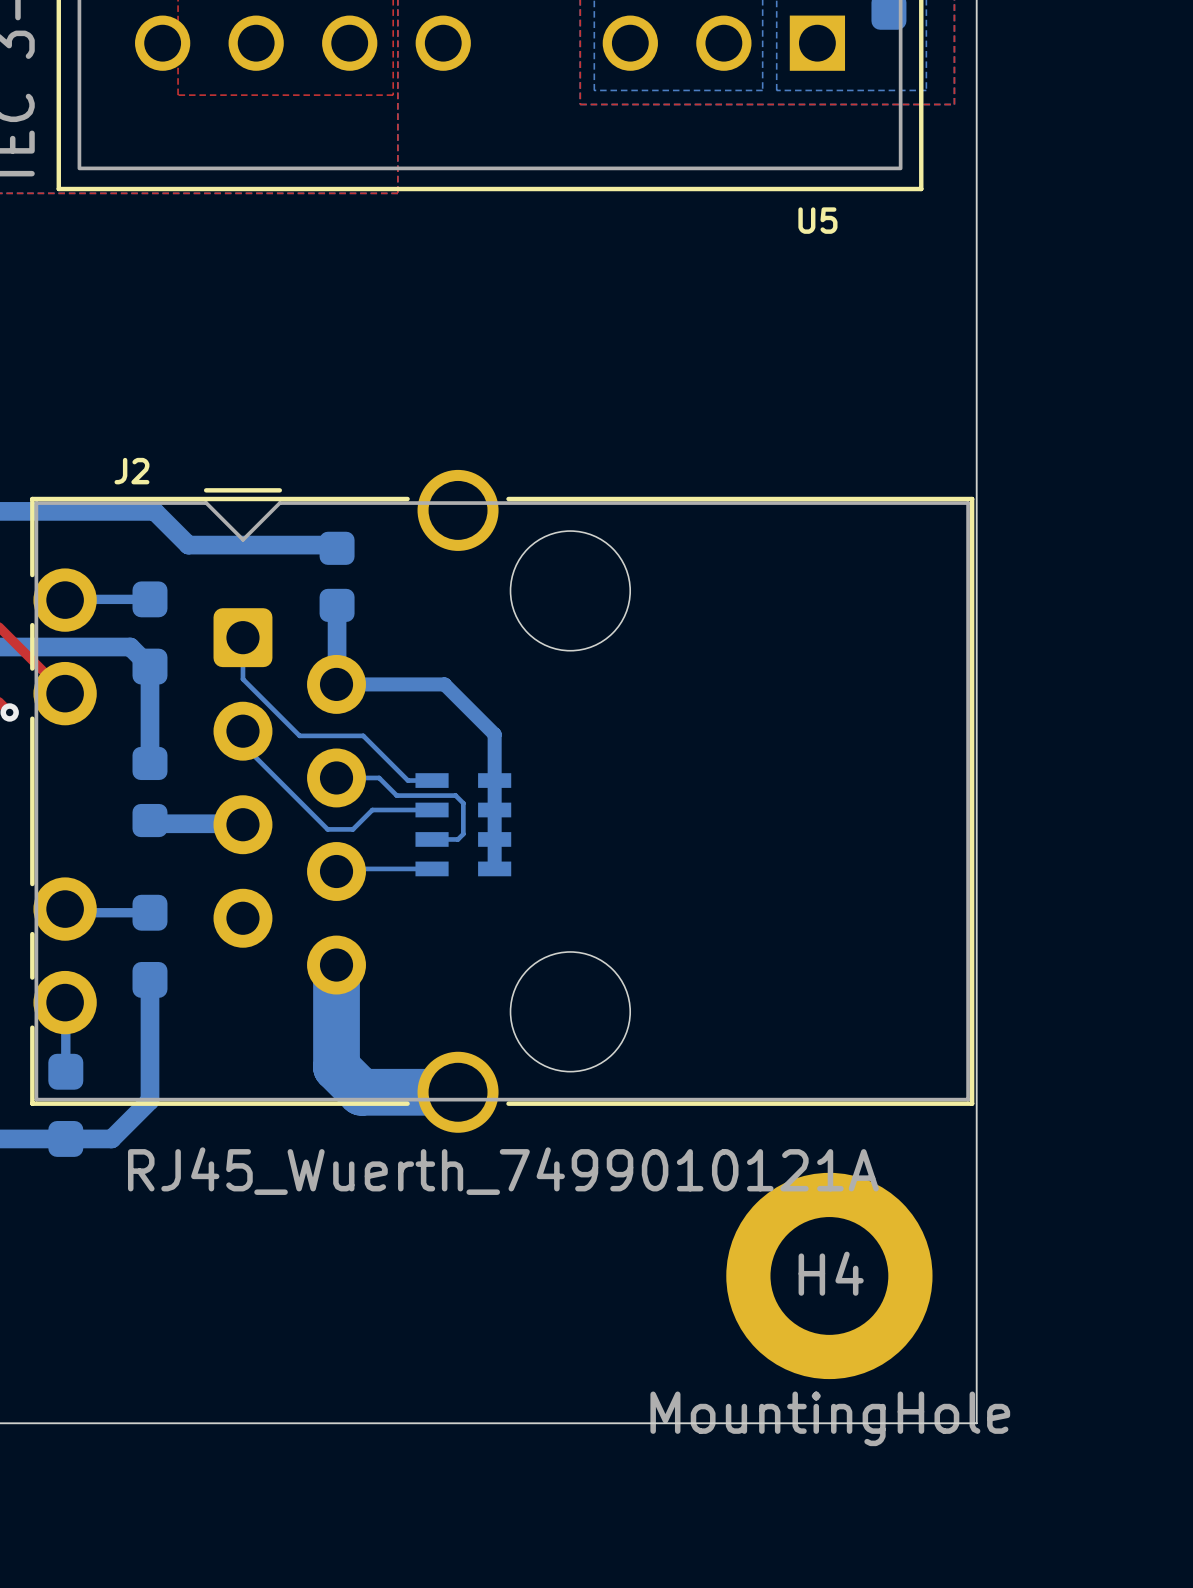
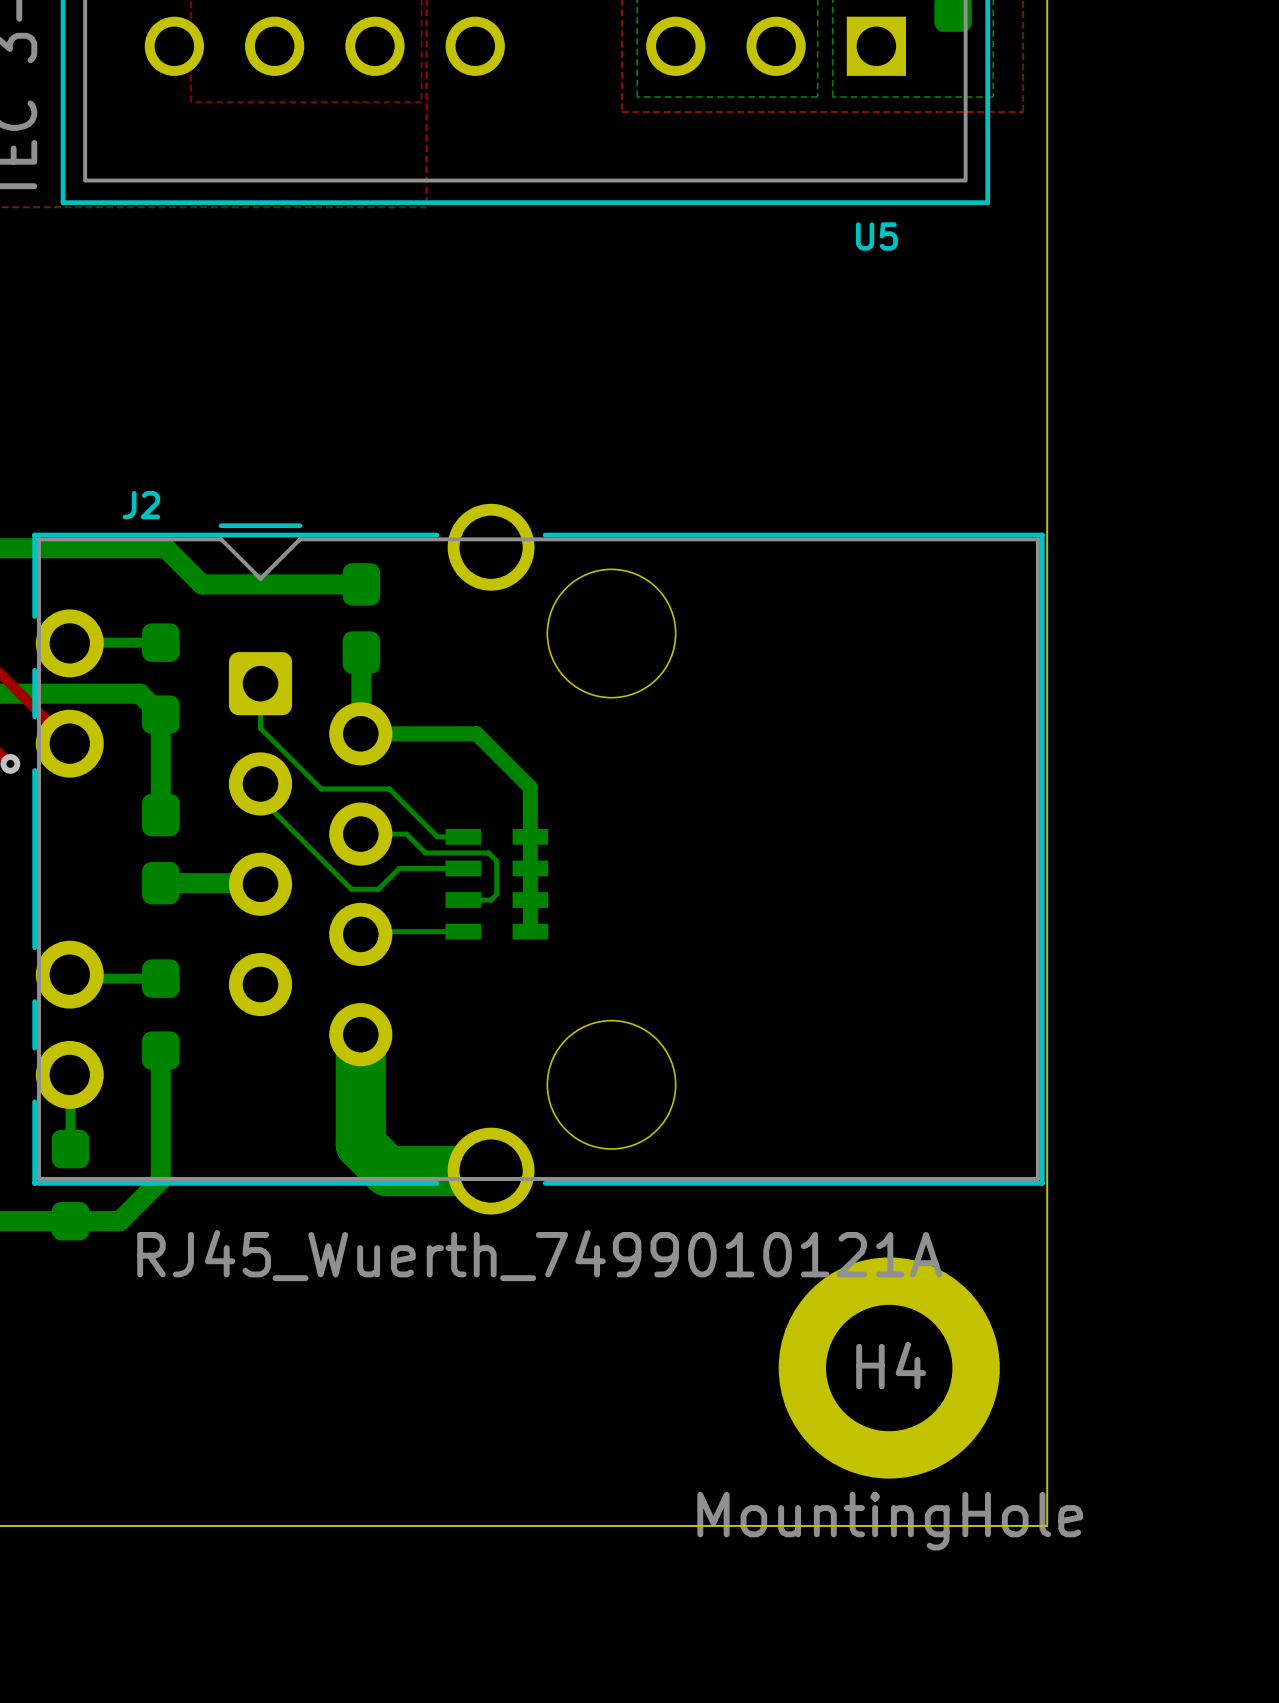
part footprint: [319, 531, 355, 622] -> [342, 563, 381, 674]
part footprint: [132, 746, 168, 838] -> [142, 793, 180, 905]

